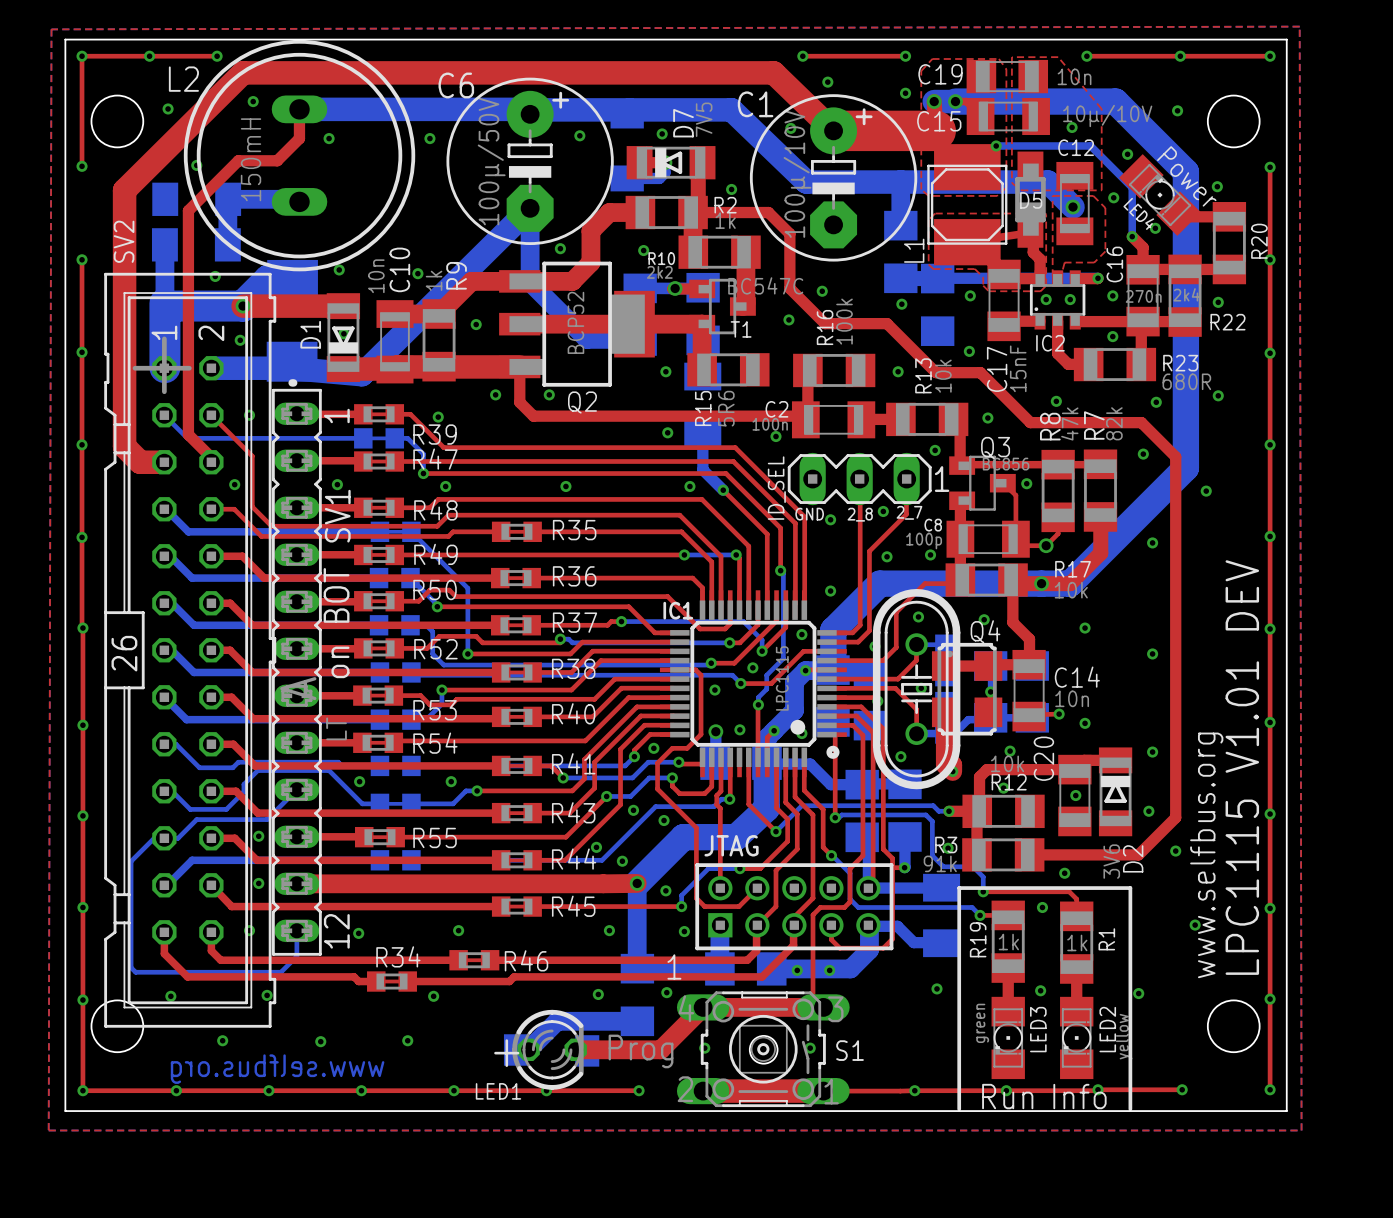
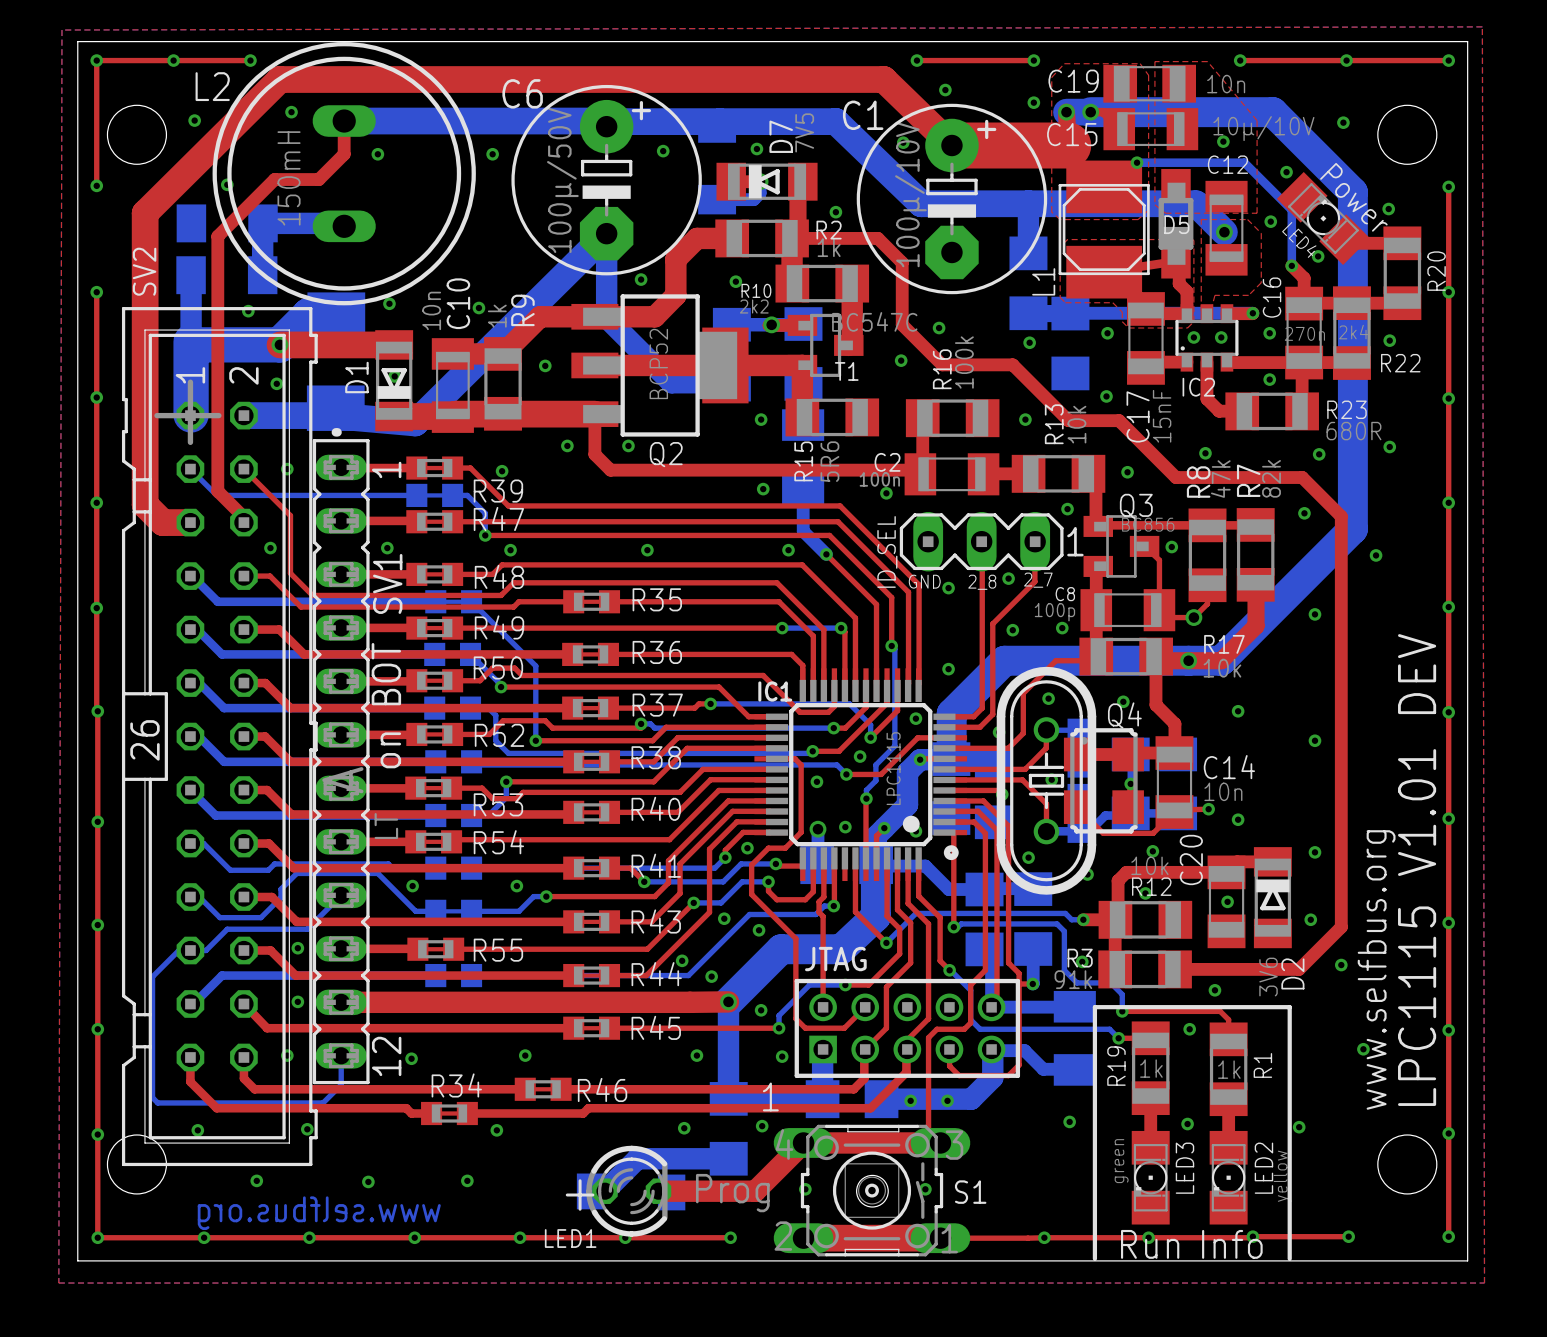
top track: (943, 712) (945, 712) (945, 765) (952, 765) (952, 771) -> (1077, 807) (1103, 833) (1153, 833) (1174, 811)

